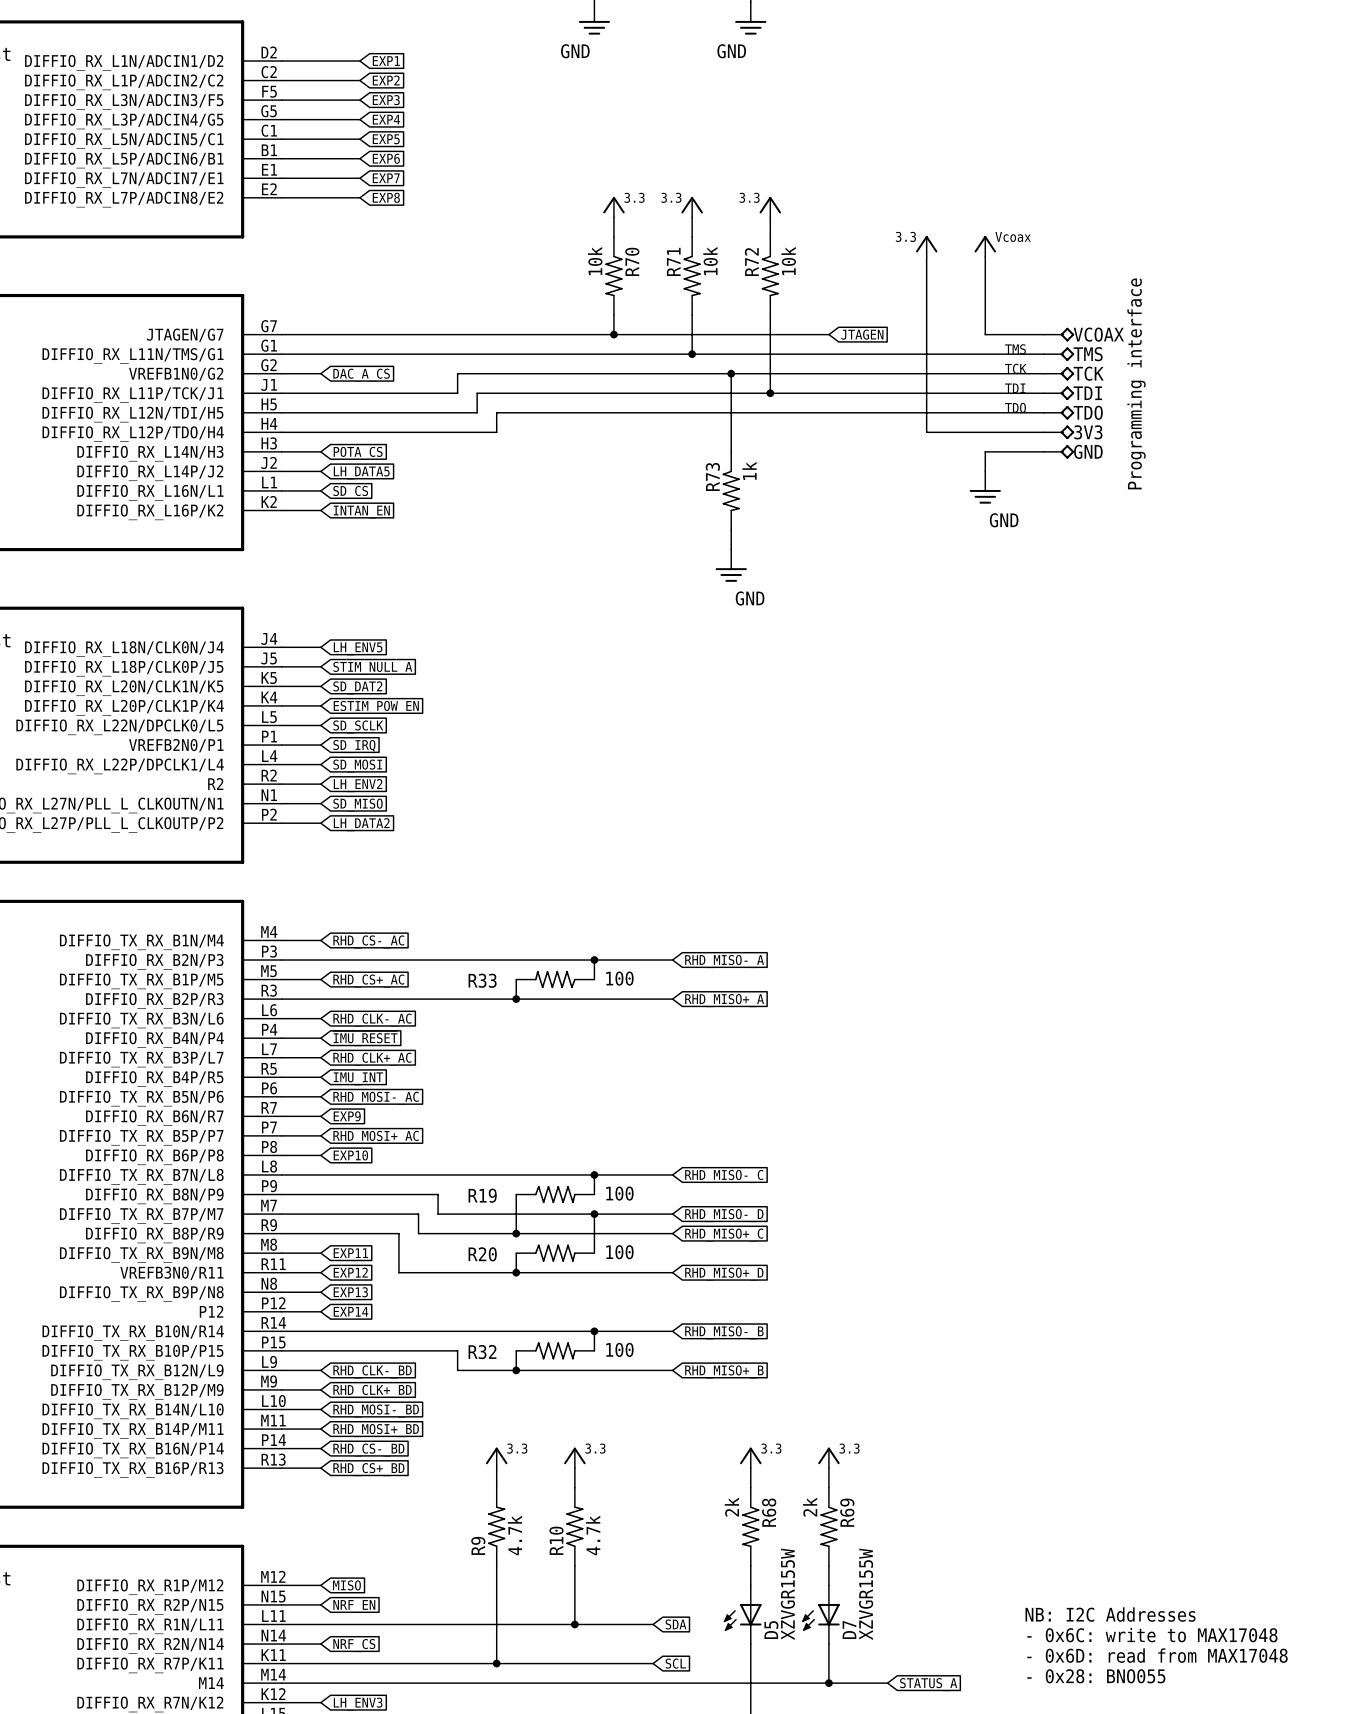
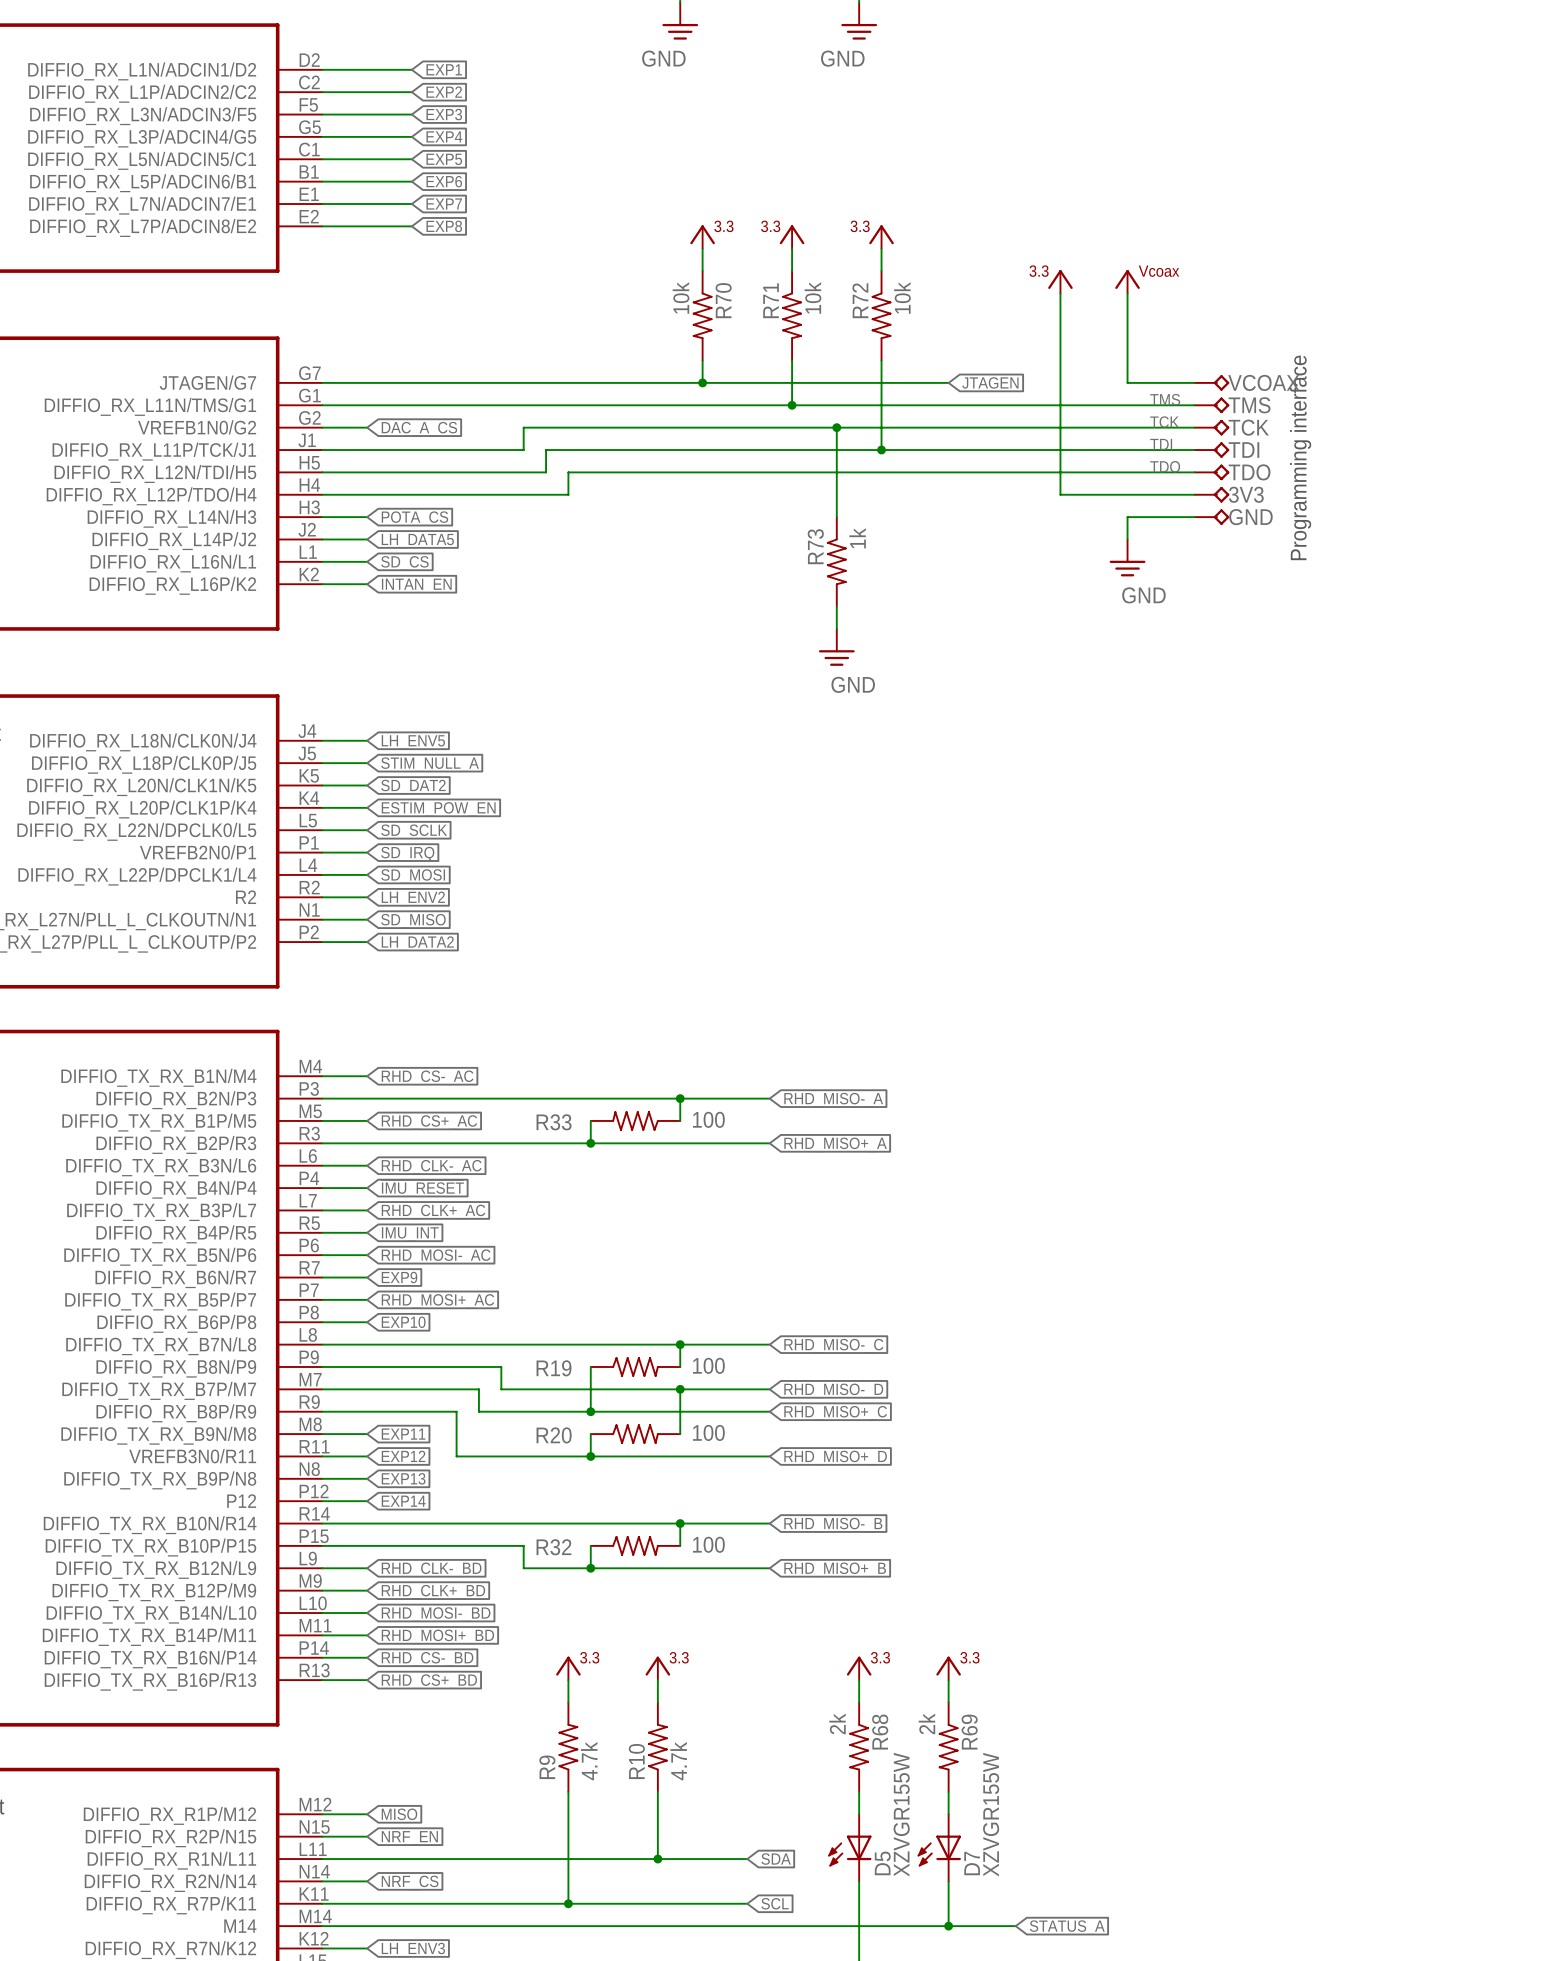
text: NB: I2C Addresses (1110, 1614) -> none
text: - 0x6C: write to MAX17048 (1152, 1635) -> none
text: - 0x6D: read from MAX17048 (1157, 1655) -> none
text: - 0x28: BNO055 (1096, 1676) -> none

